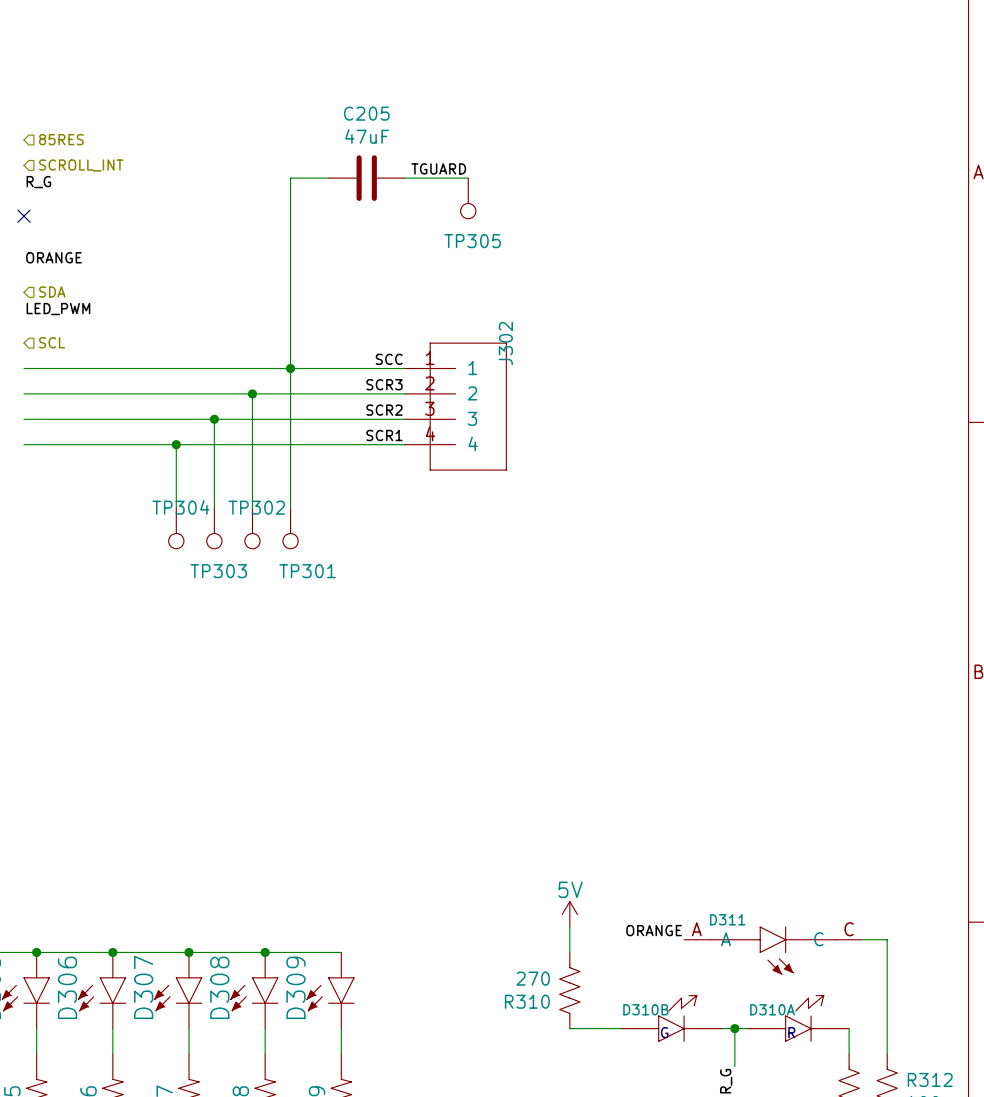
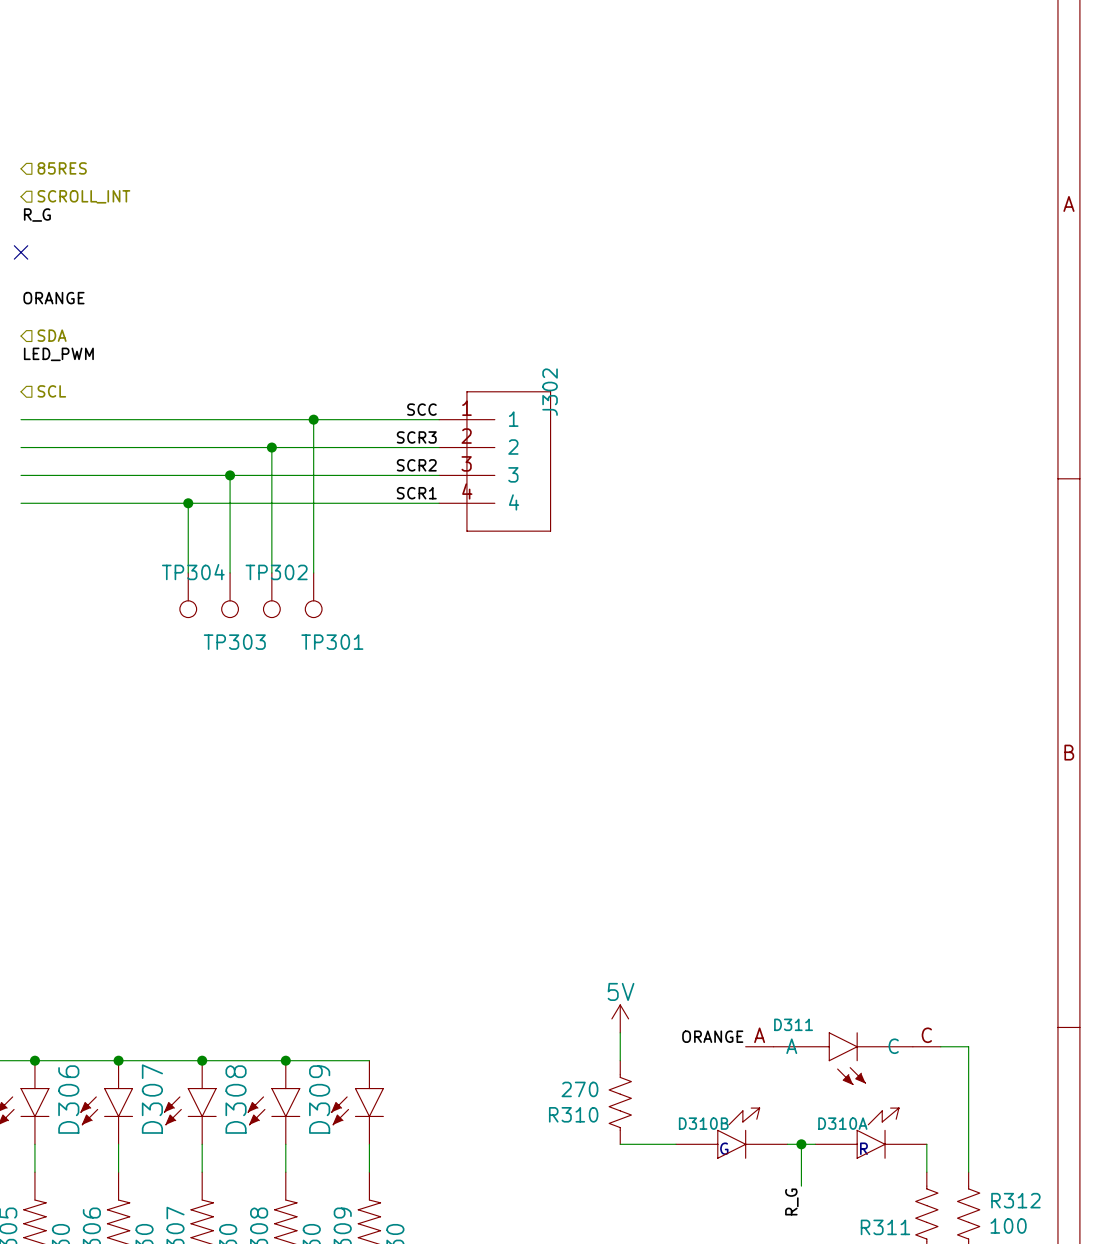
label: TGUARD (438, 168) -> none
wire: (328, 178) (290, 178) (290, 368) -> none
C205: 47uF (366, 178) -> none
wire: (404, 178) (468, 178) -> none
TP305: (468, 198) -> none

